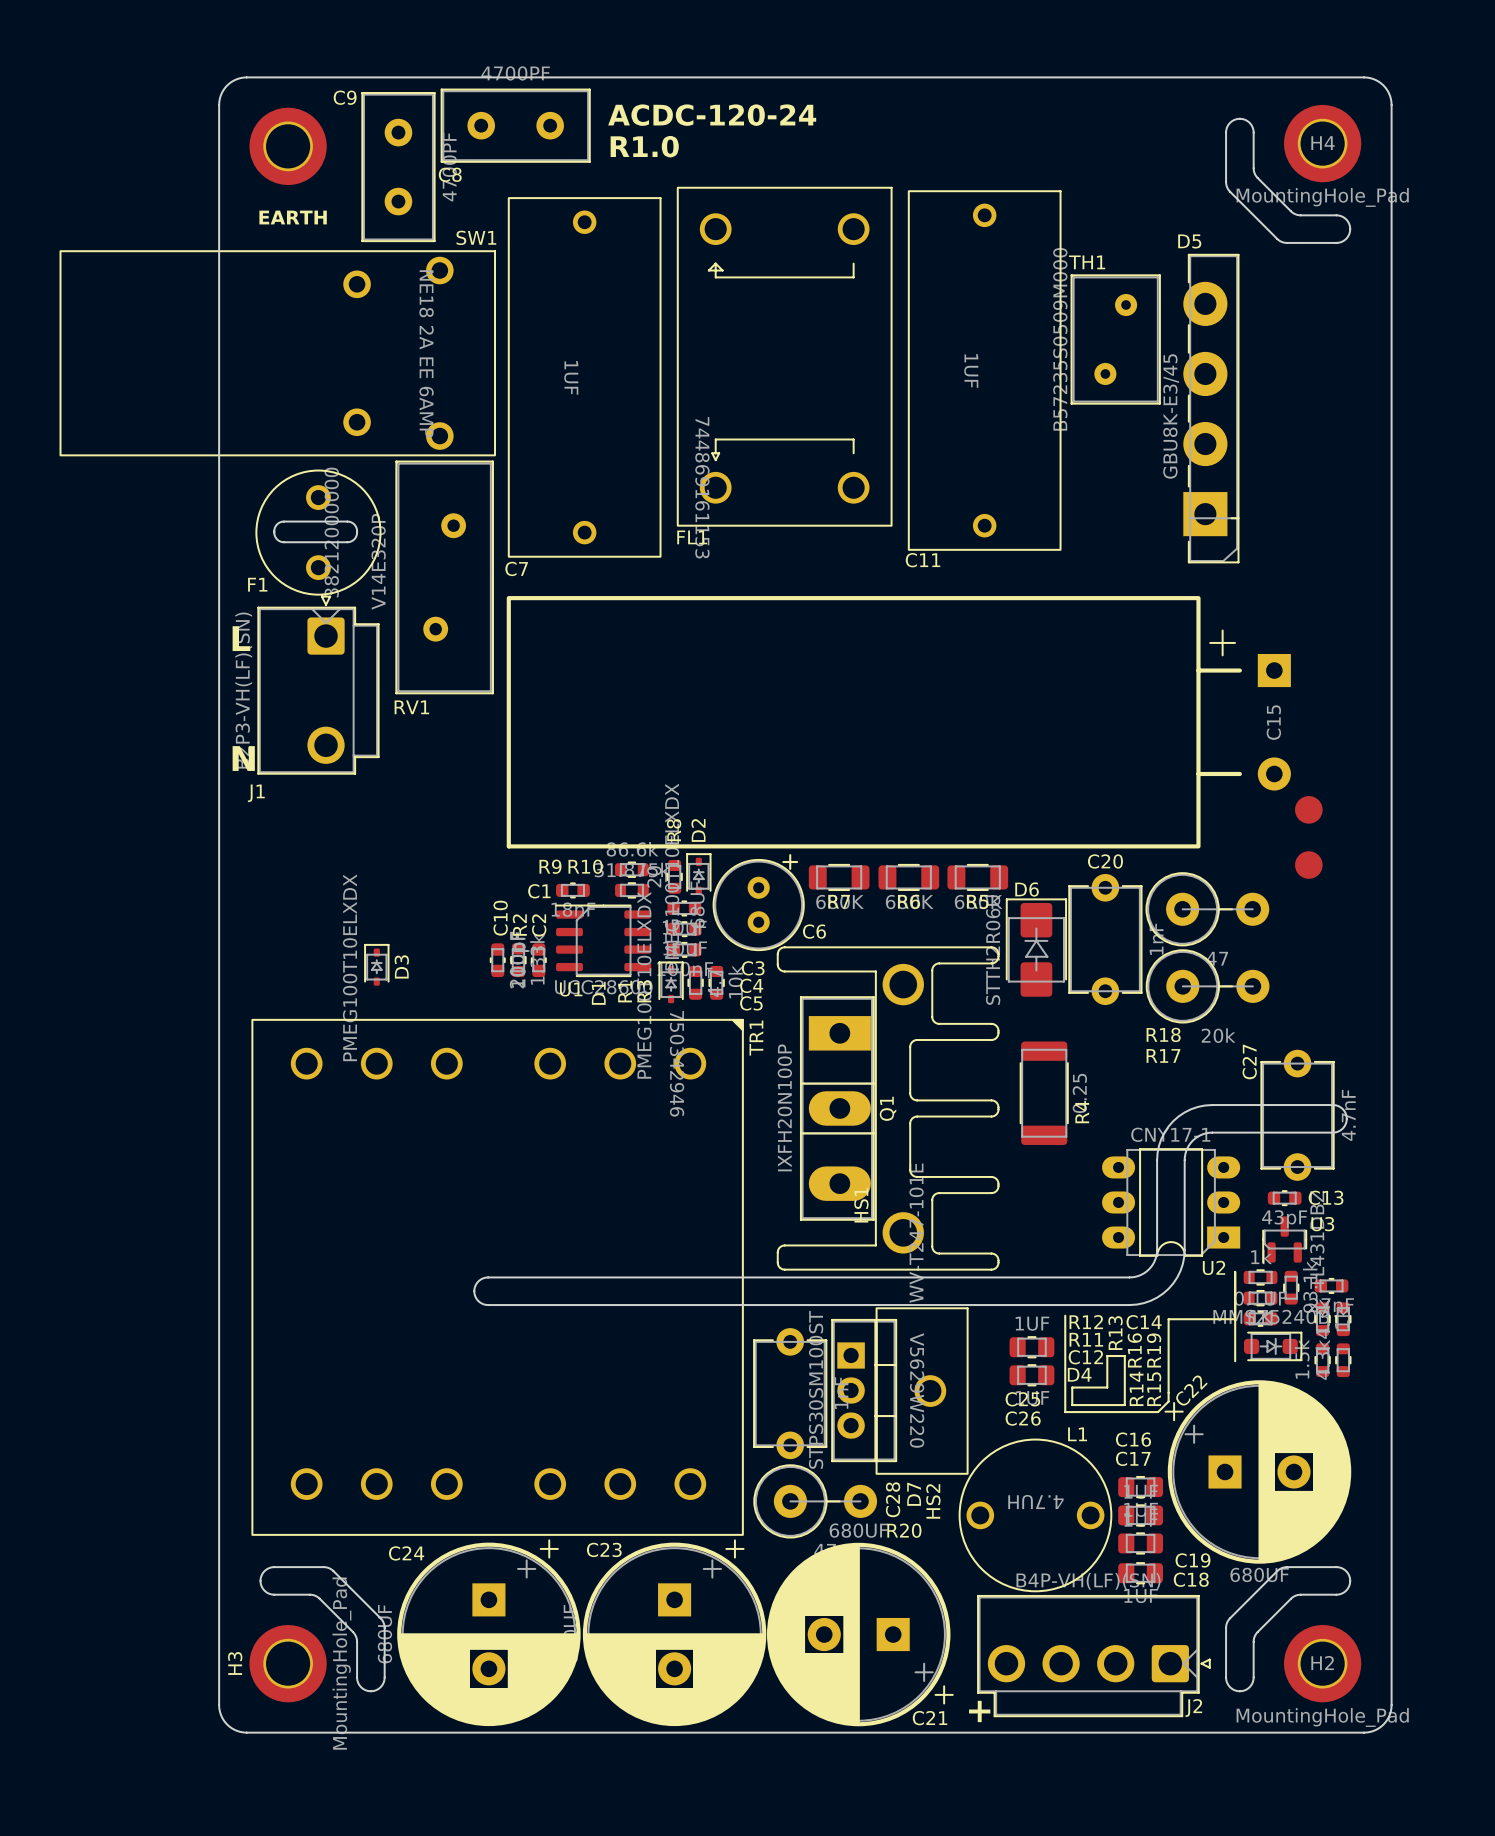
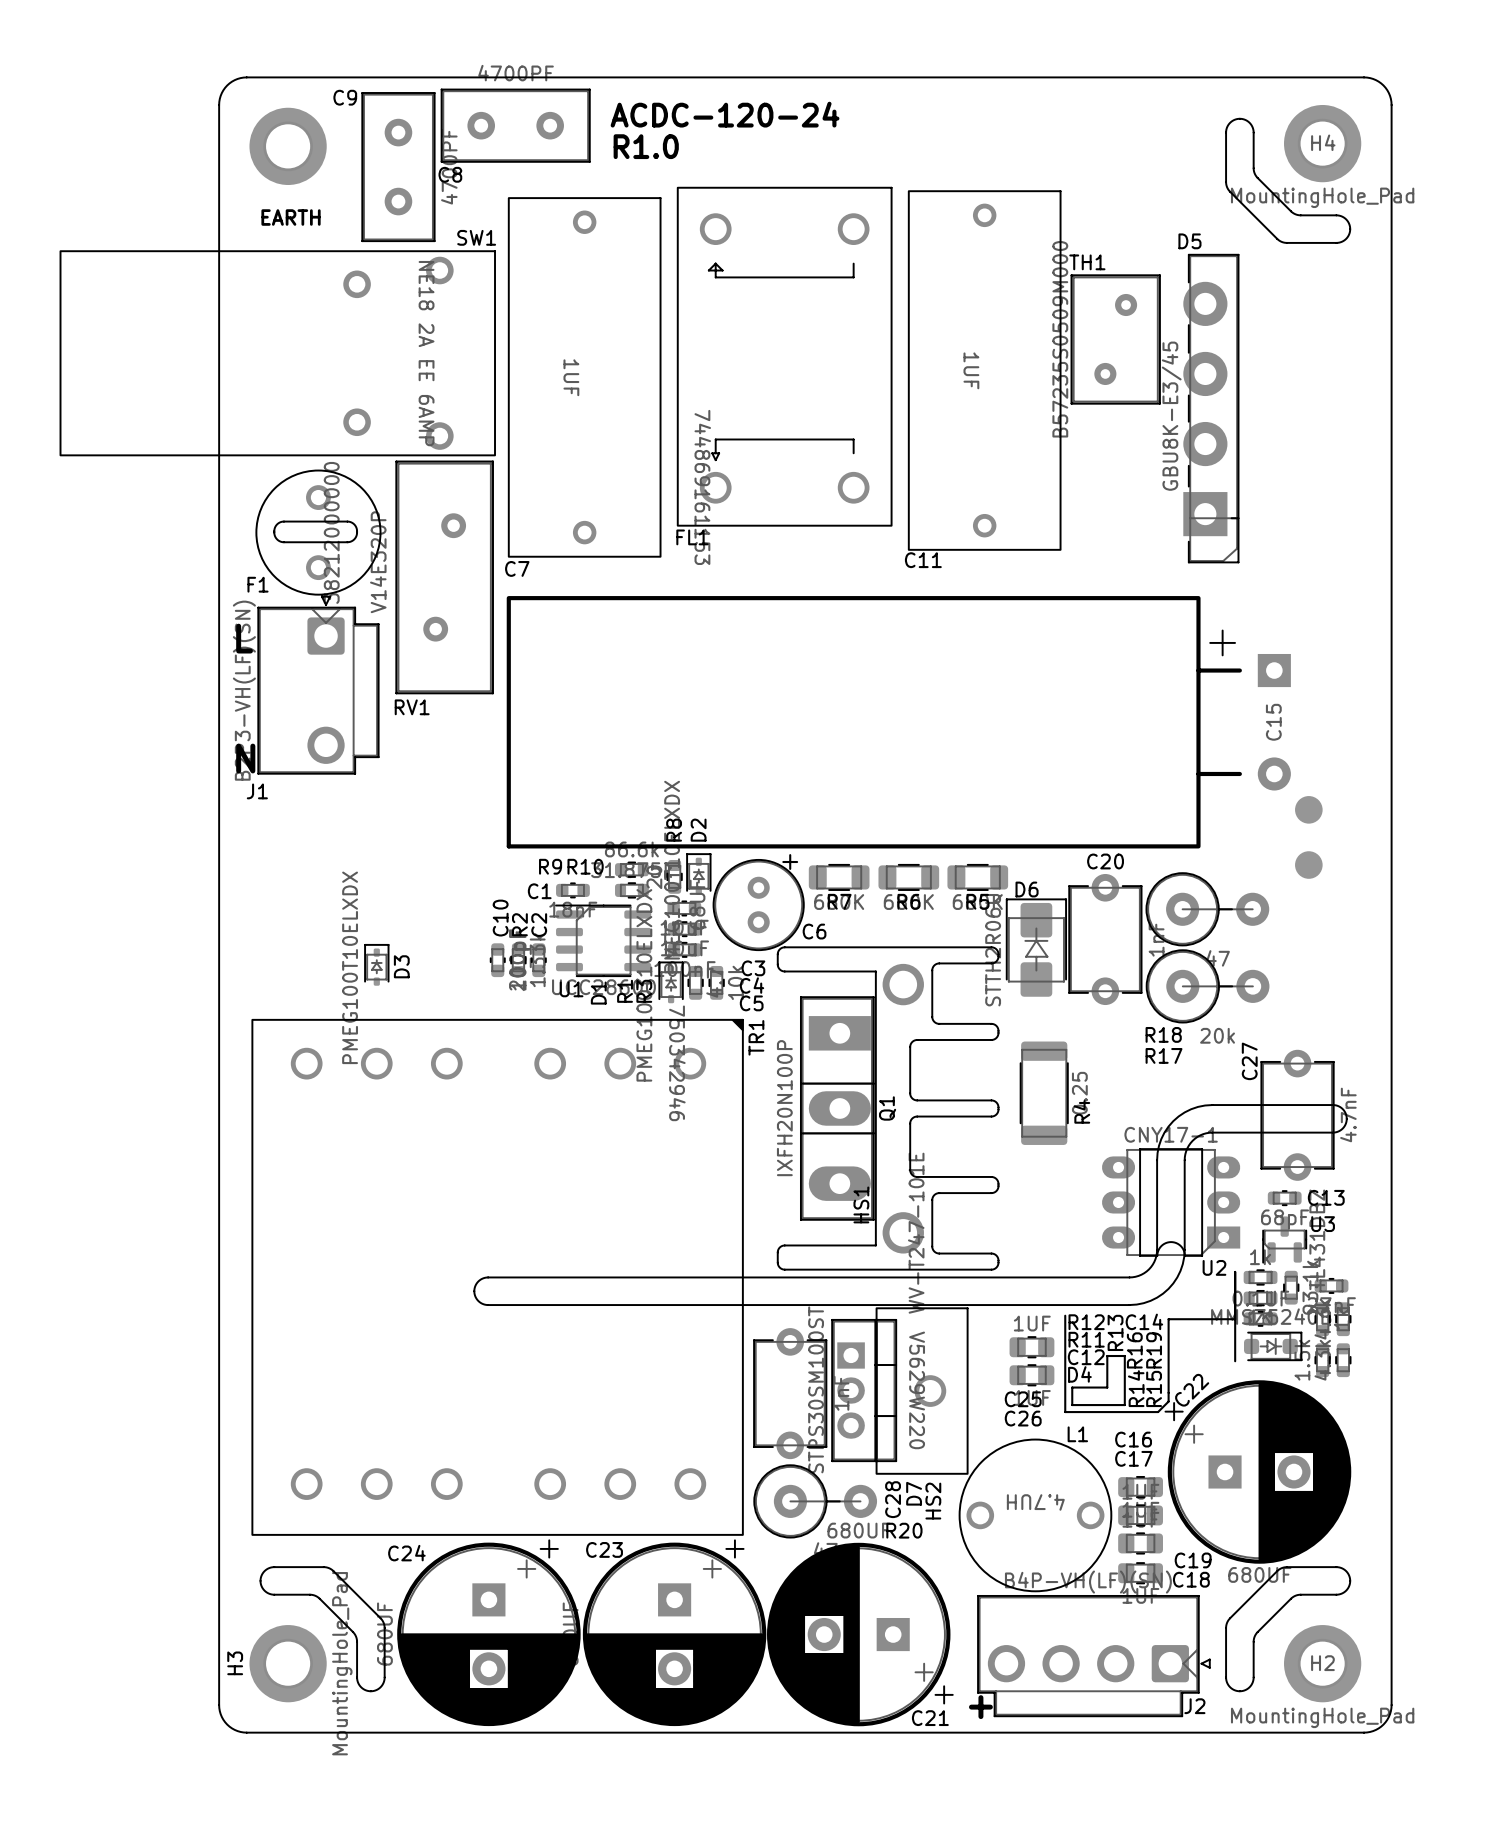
C13 value: 43pF (1284, 1219) -> 68pF (1285, 1219)

